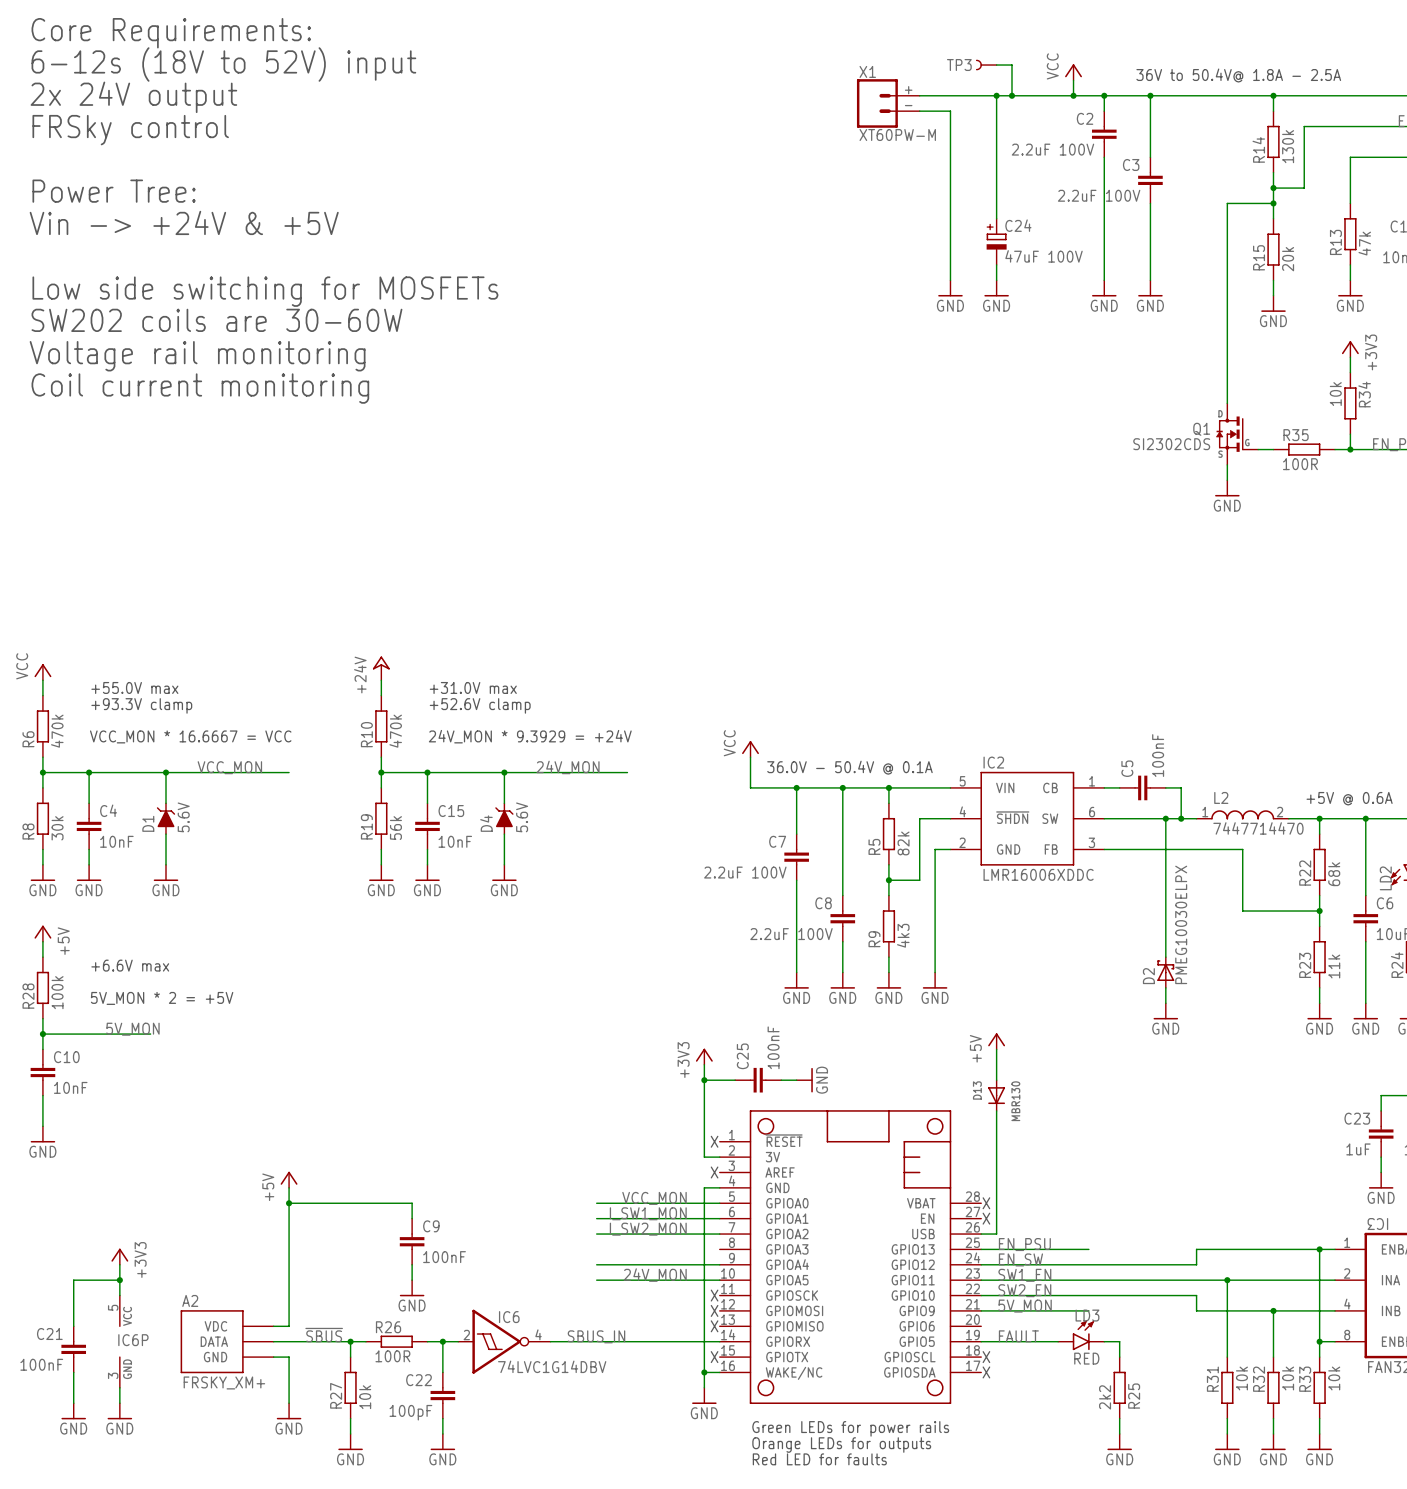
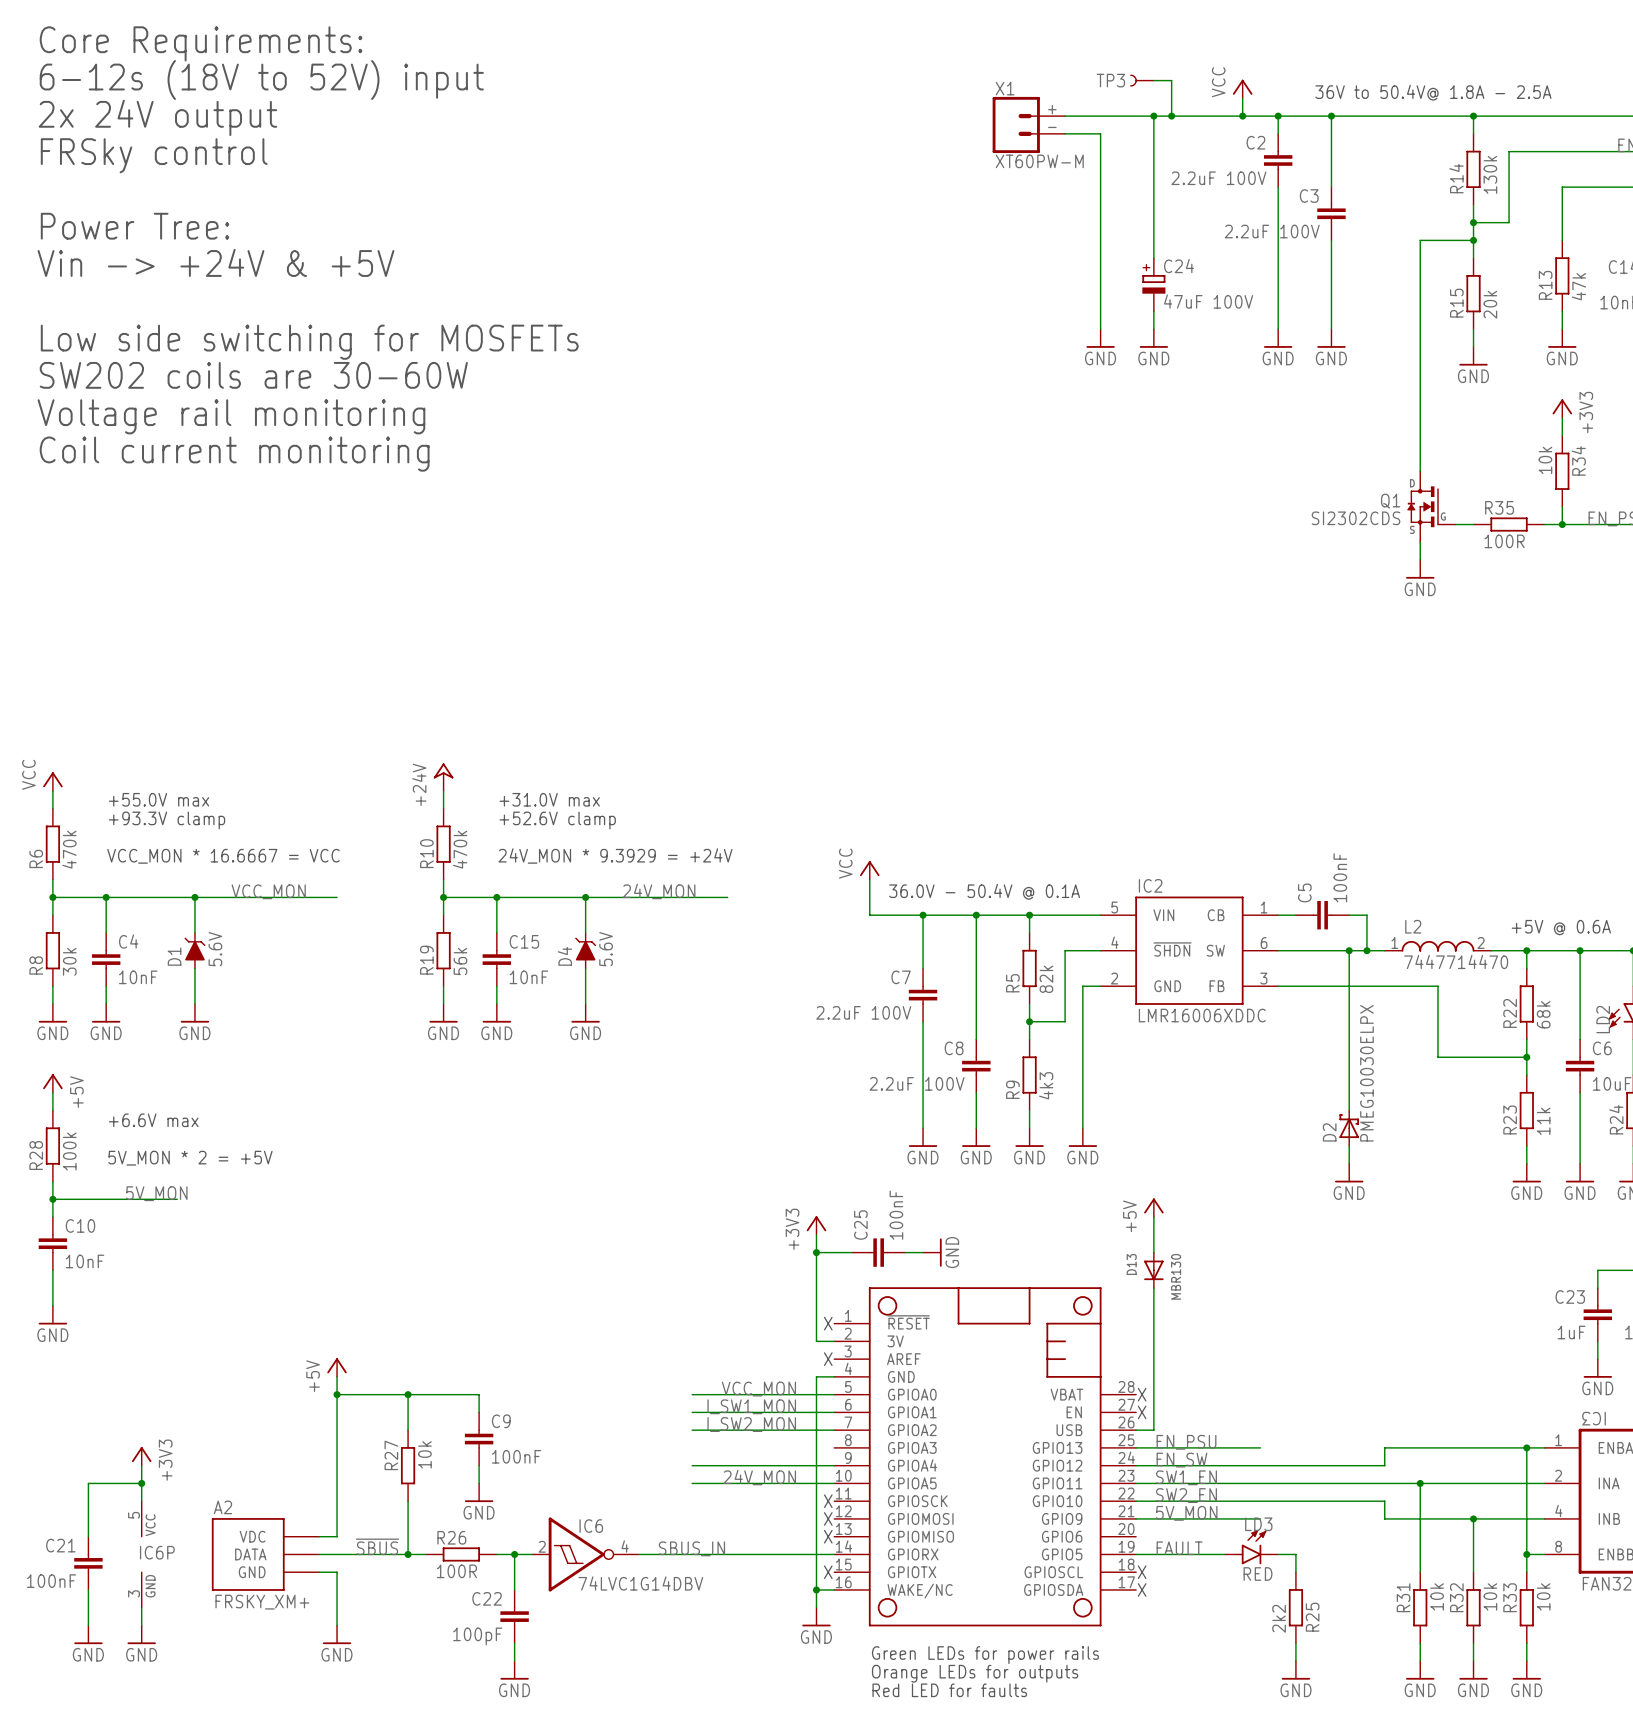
wire: none -> (408, 1394) (408, 1430)
junction: none -> (408, 1394)
wire: (350, 1341) (350, 1357) -> (408, 1554) (408, 1501)
R27 position: (350, 1387) -> (408, 1465)
R27 name position: R27 (336, 1395) -> R27 (391, 1455)
R27 value position: 10k (365, 1397) -> 10k (424, 1454)
wire: (350, 1418) (350, 1433) -> none
power symbol: GND (350, 1442) -> none

